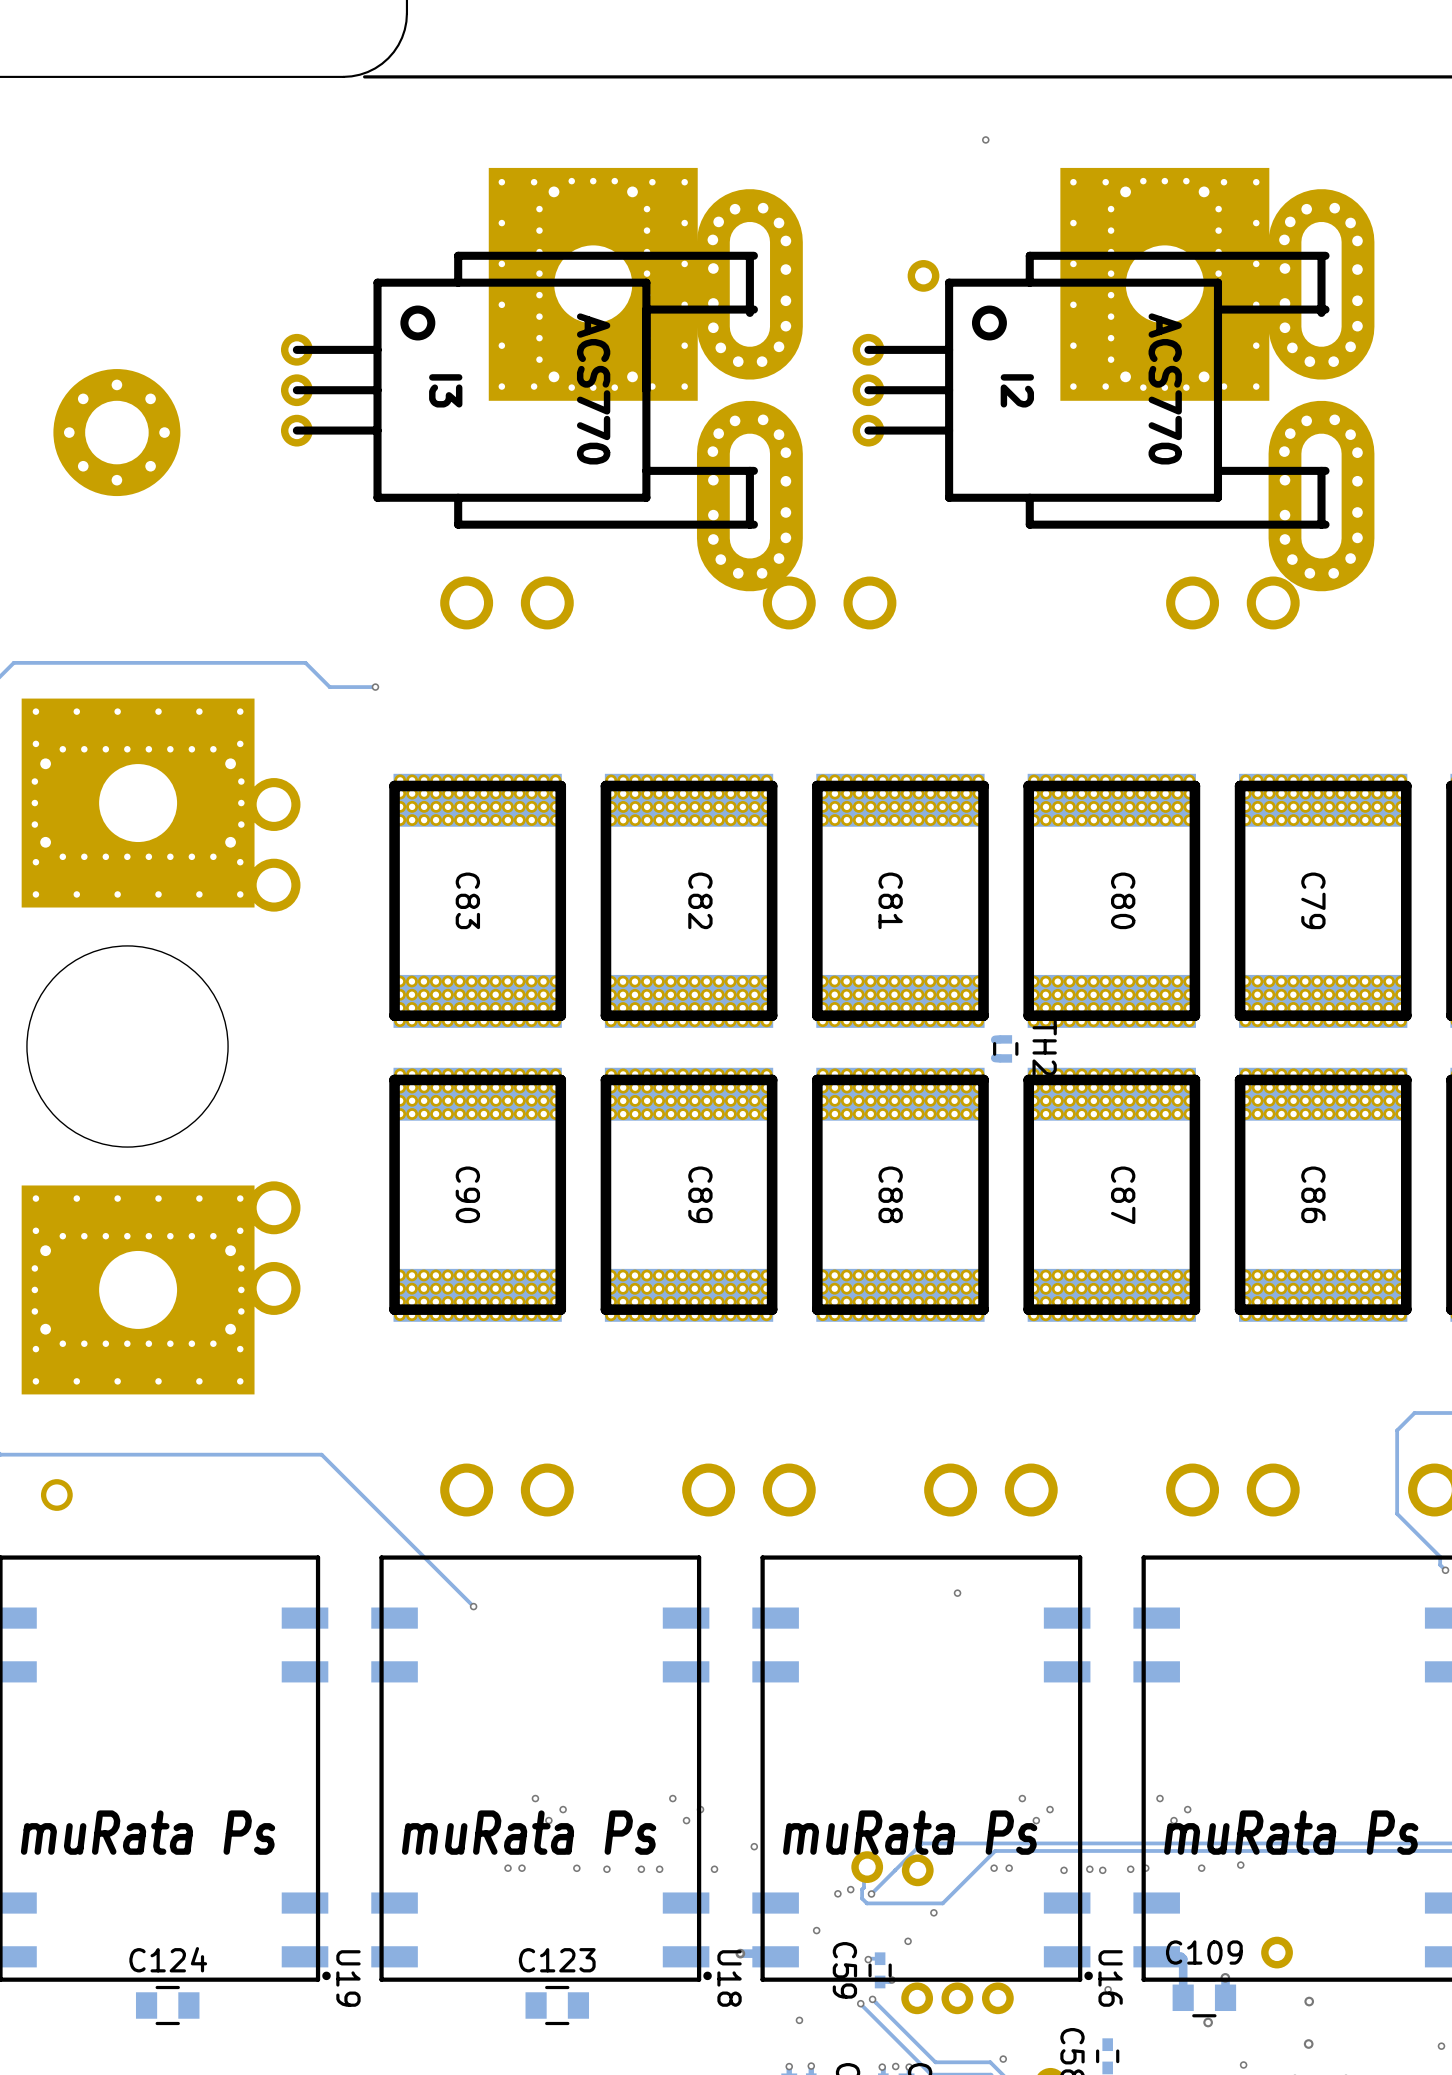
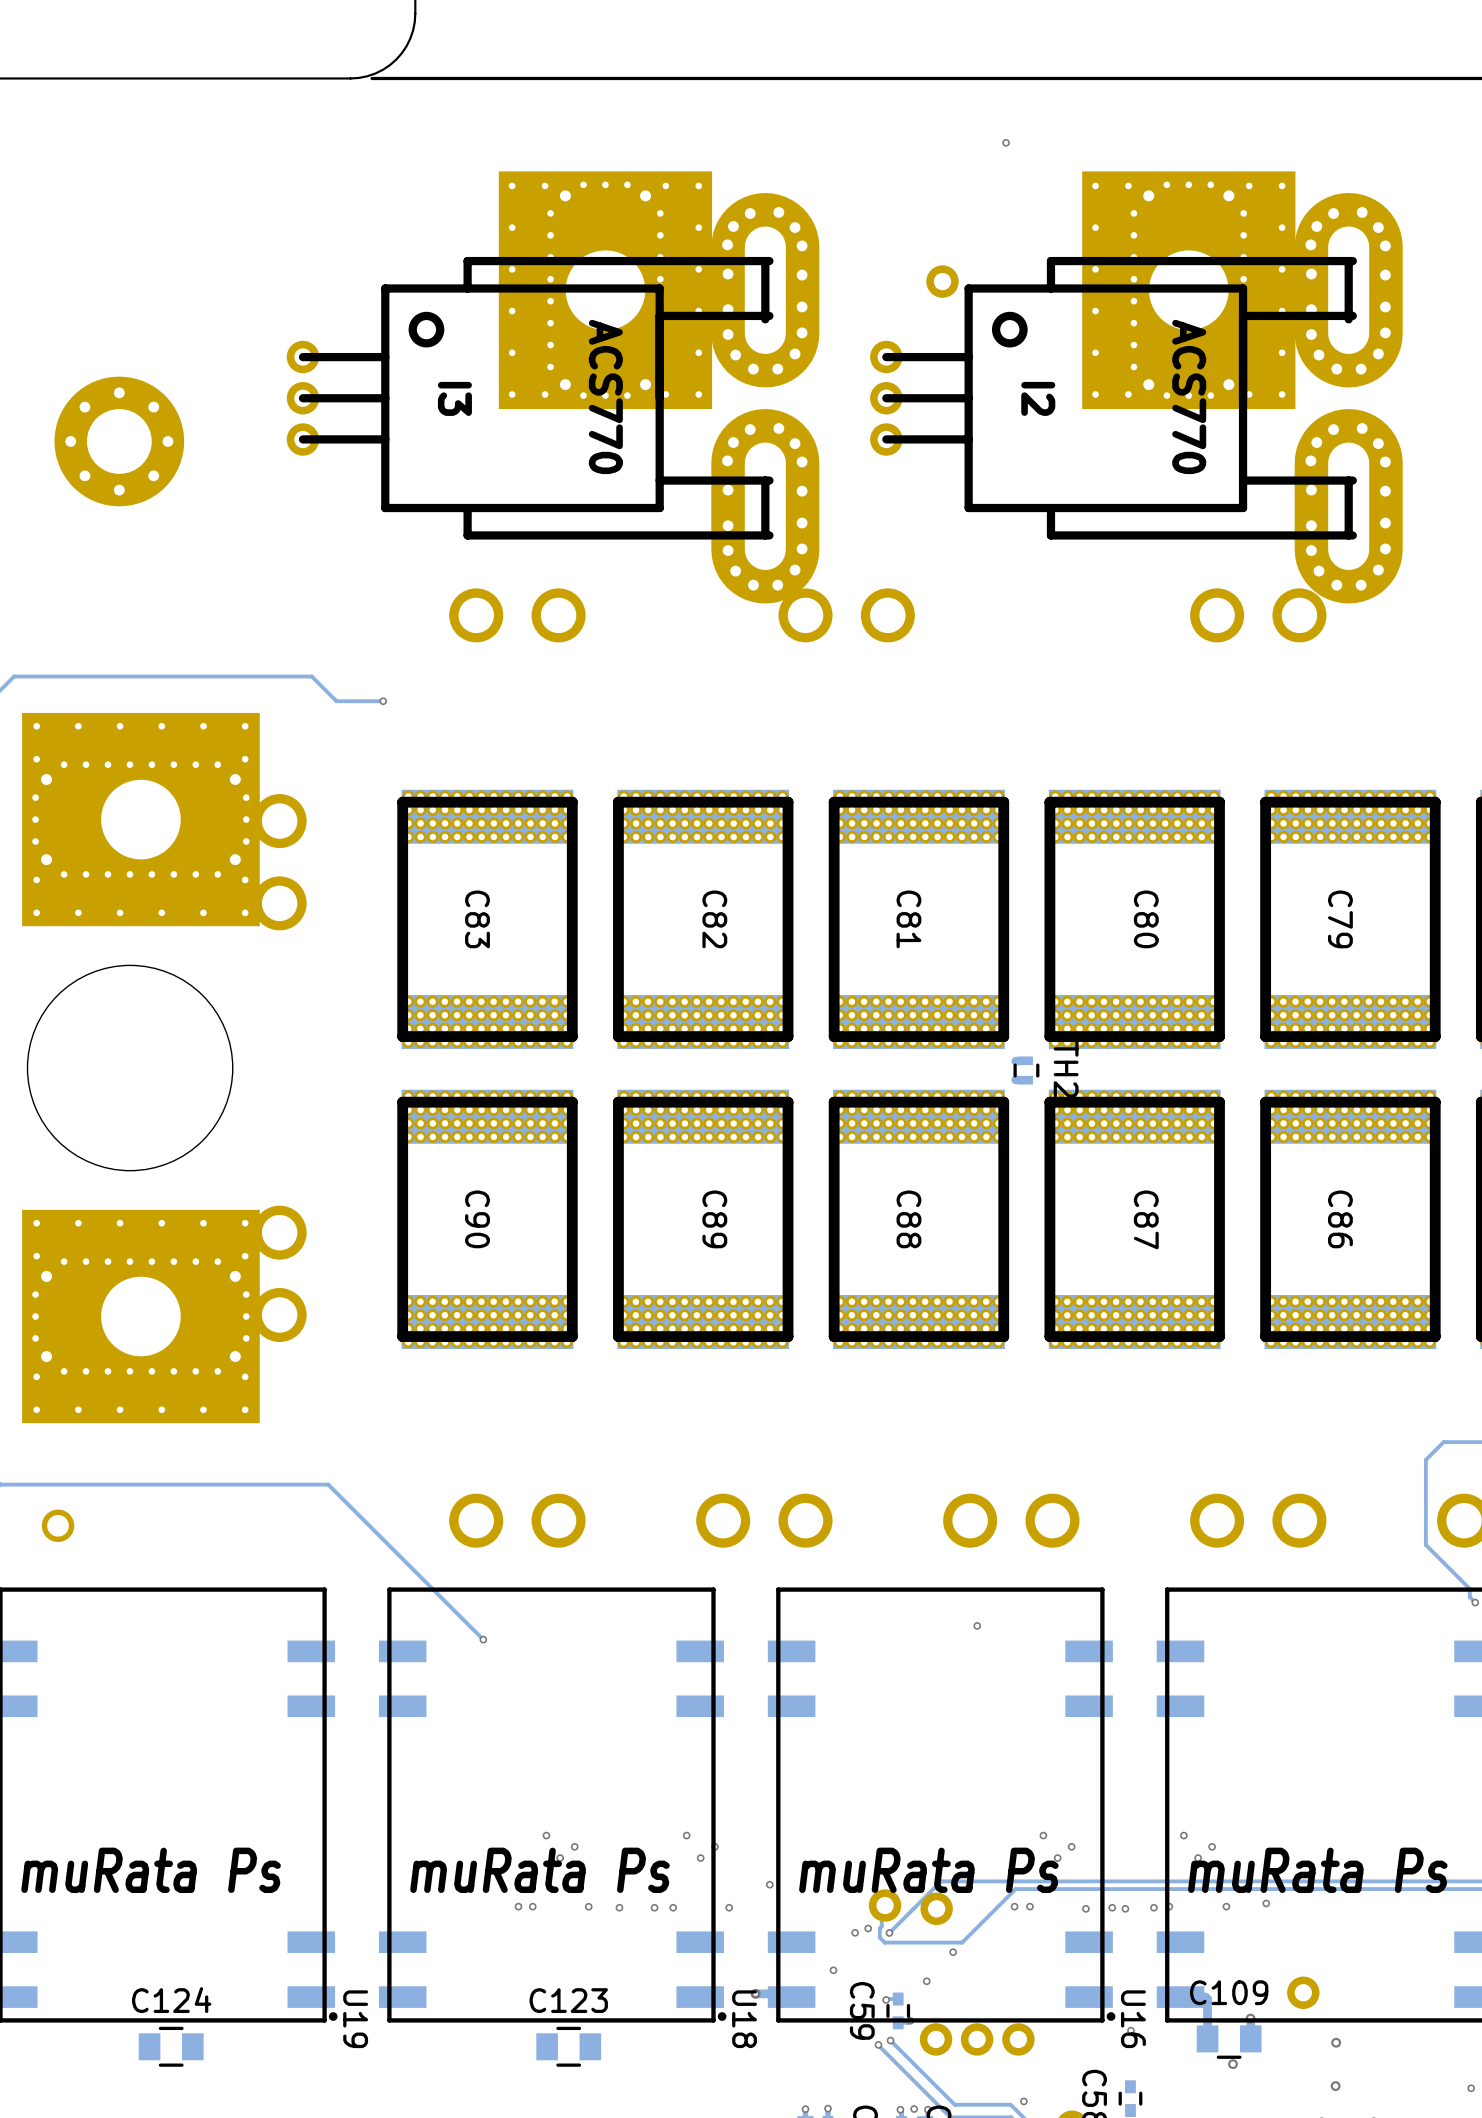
via: (799, 2020) -> none
via: (1243, 2064) -> none

